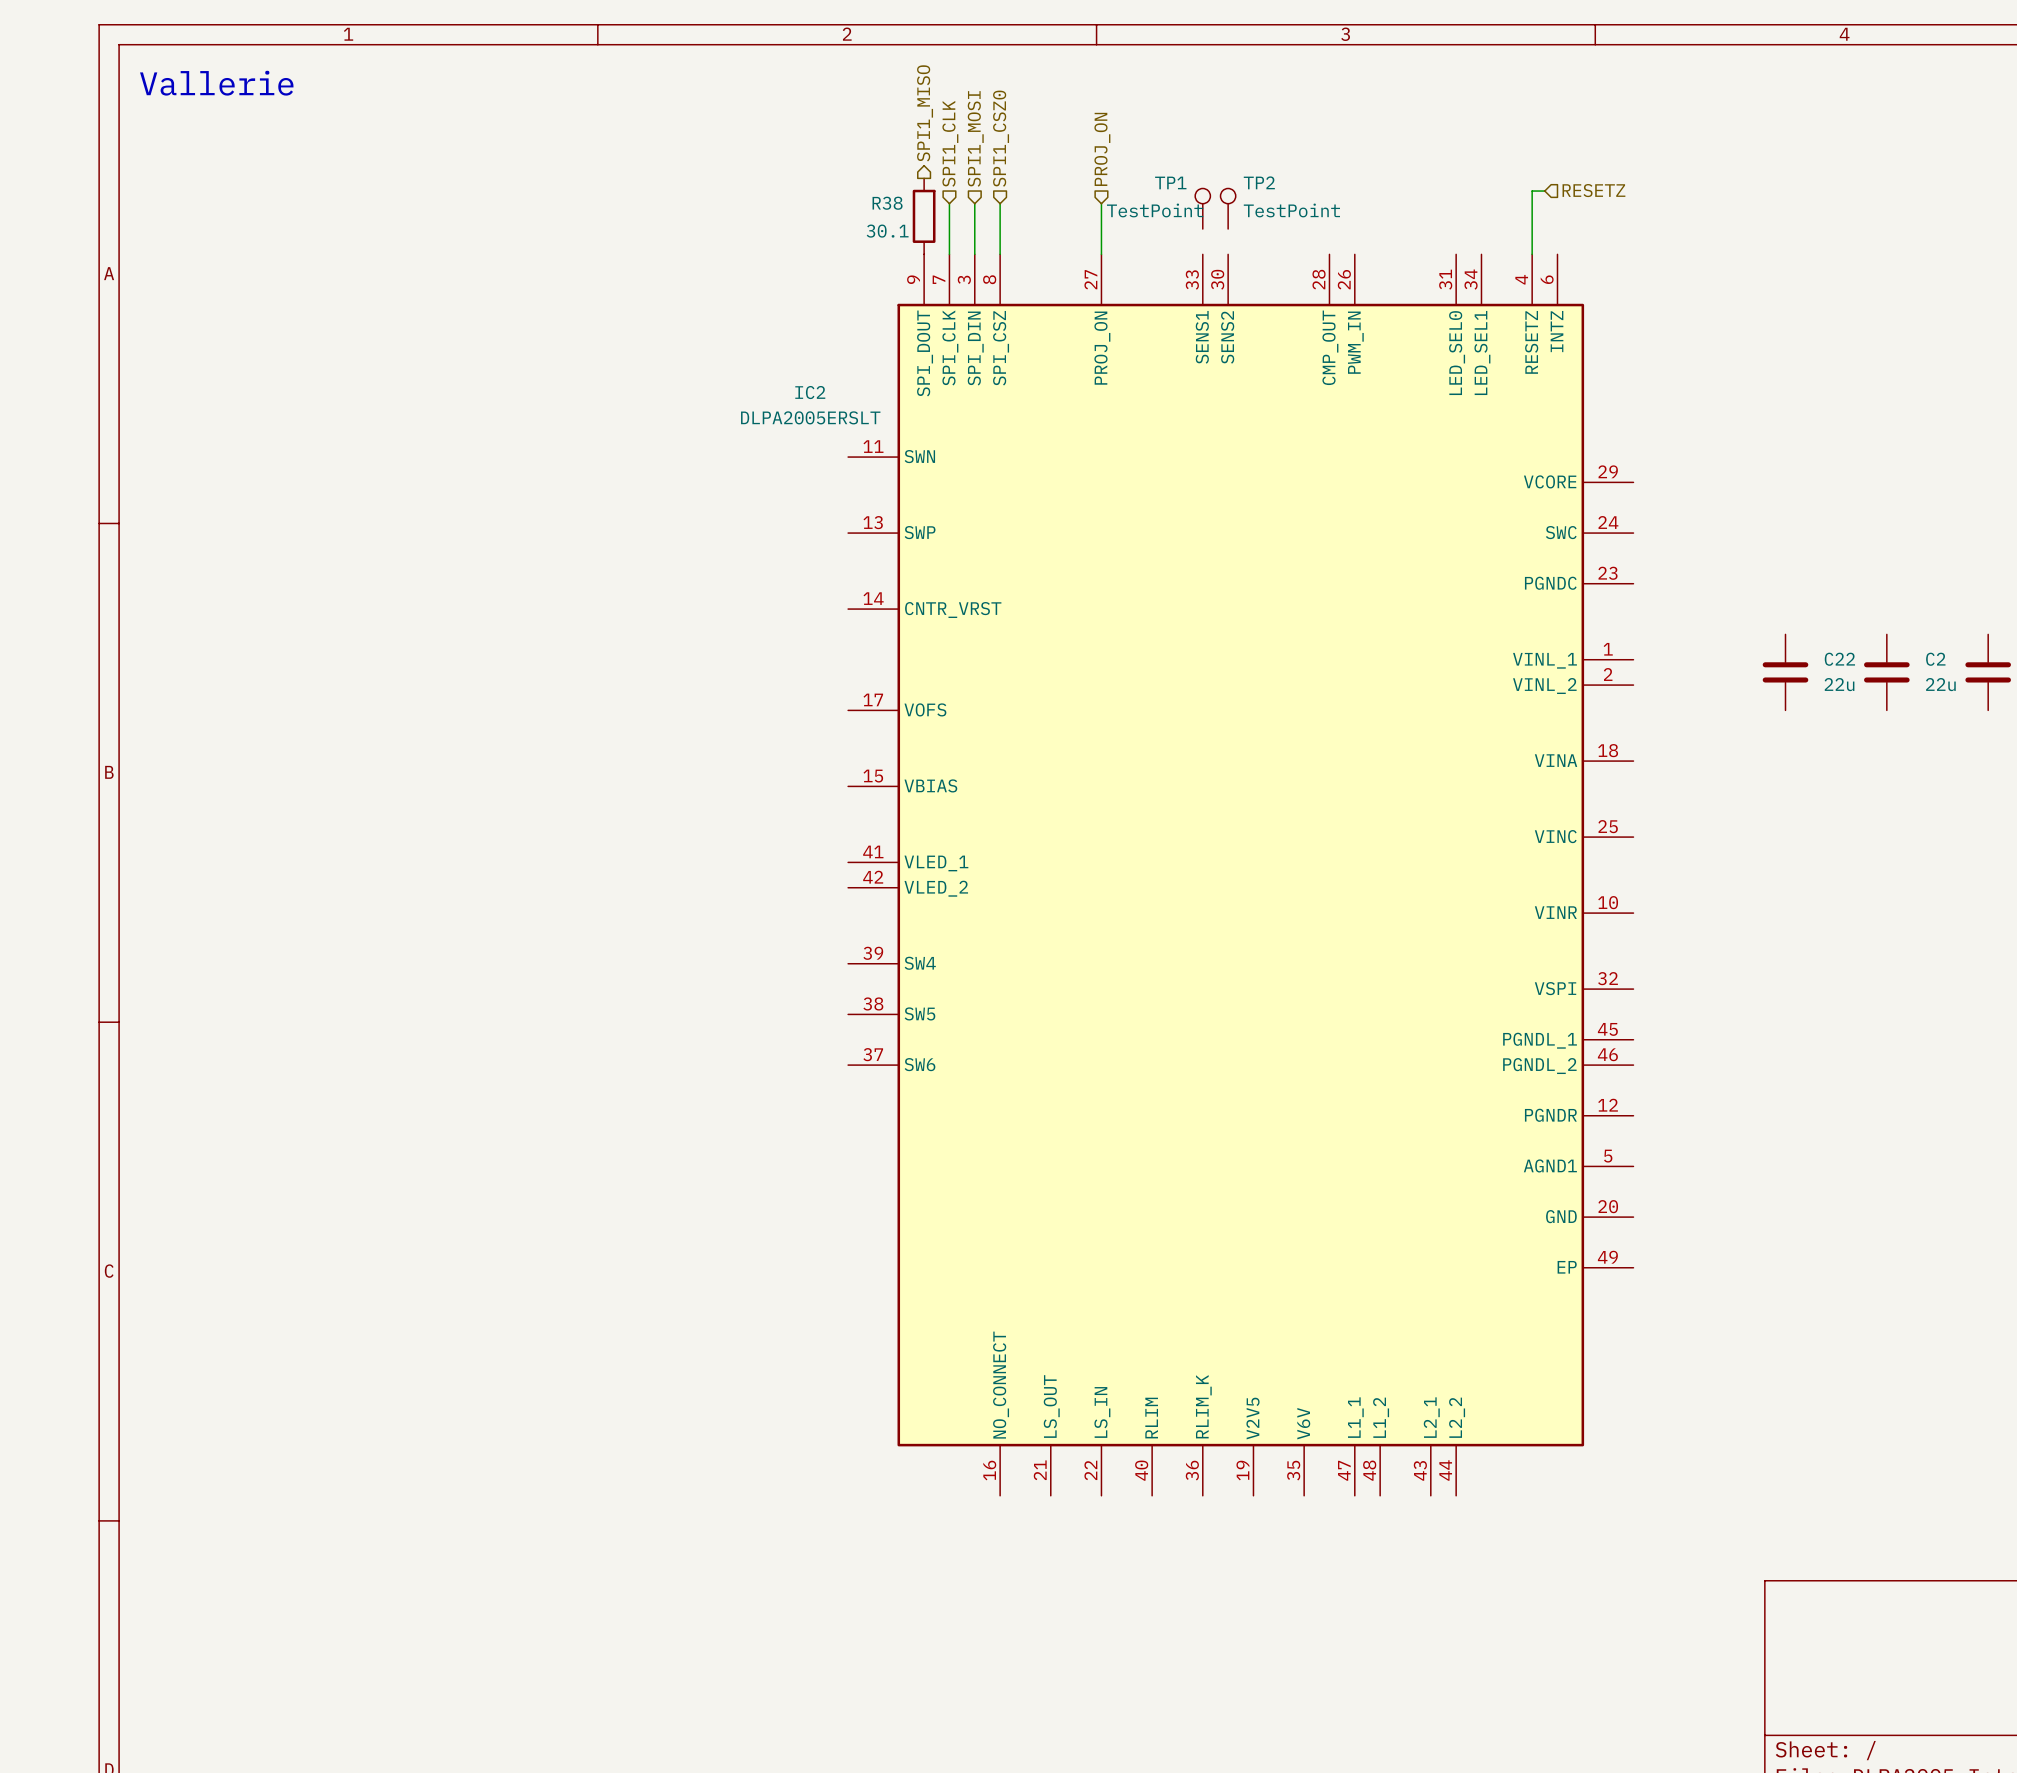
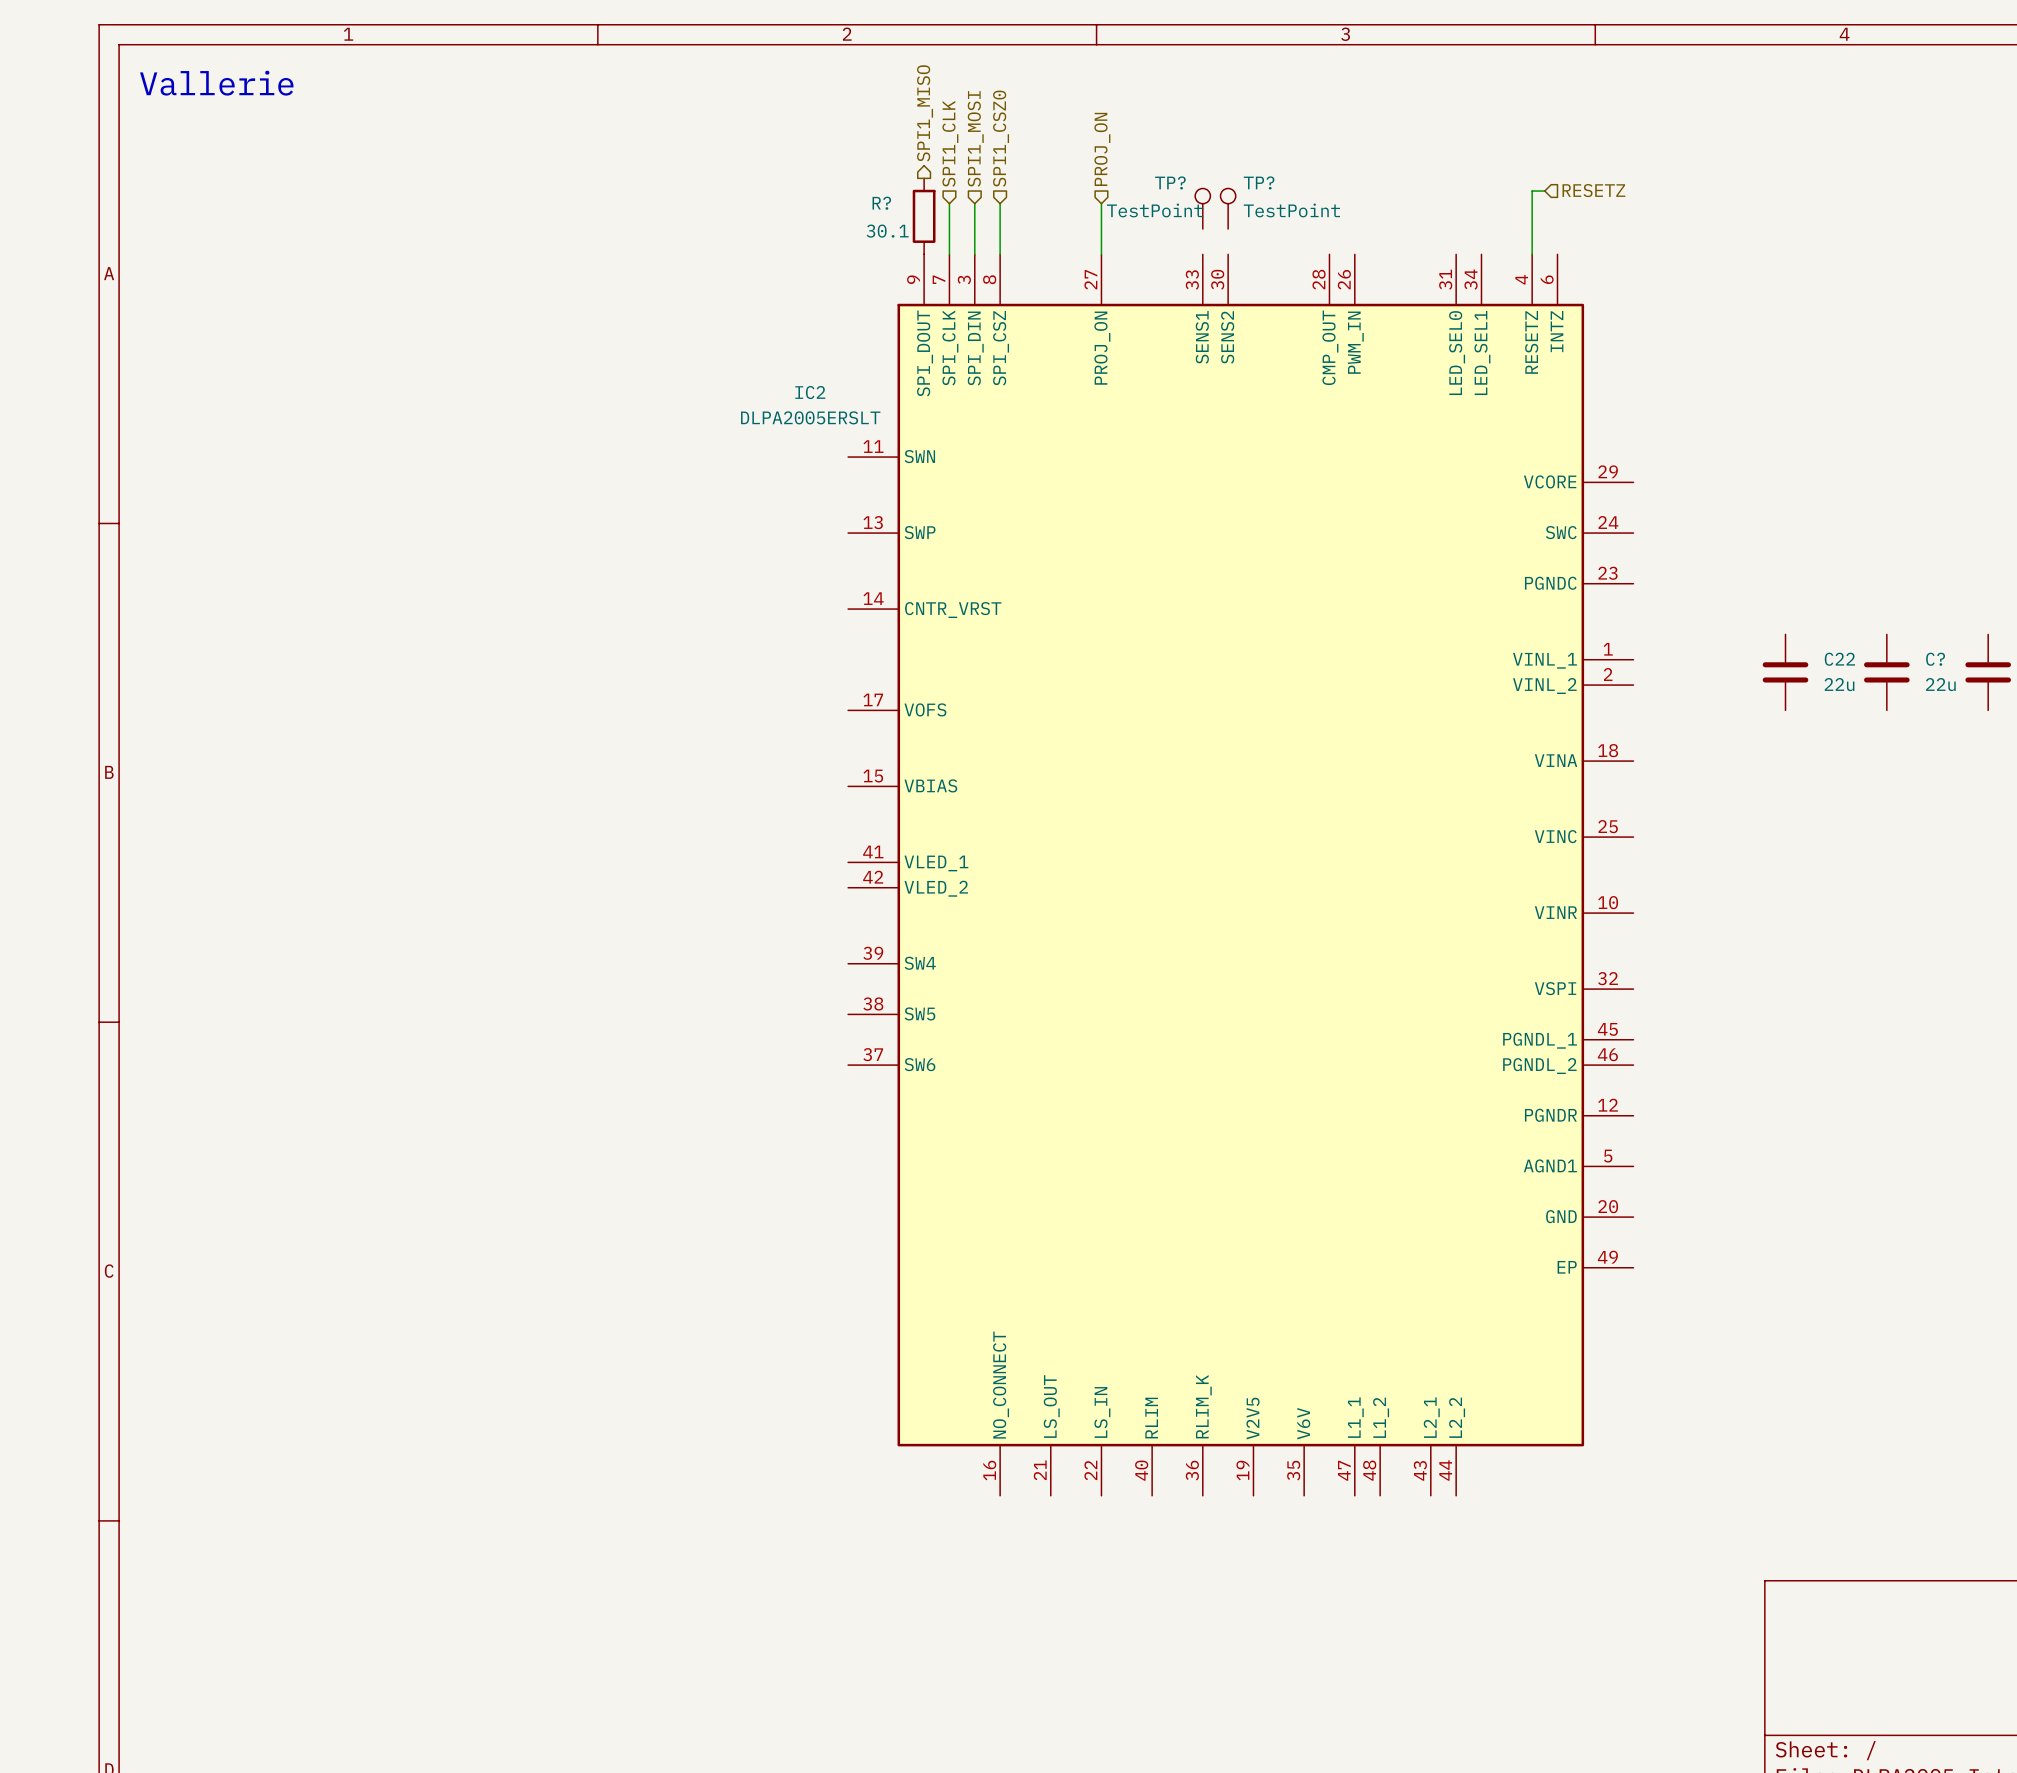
TP1 name: TP1 (1170, 182) -> TP? (1170, 182)
TP2 name: TP2 (1259, 182) -> TP? (1259, 182)
R38 name: R38 (887, 203) -> R? (881, 203)
C2 name: C2 (1935, 659) -> C? (1935, 659)

